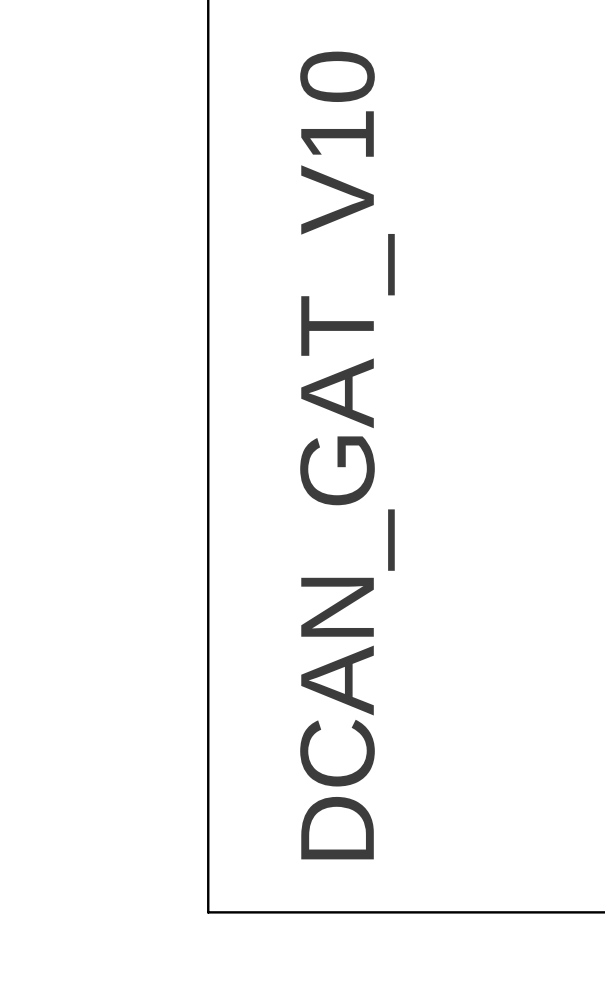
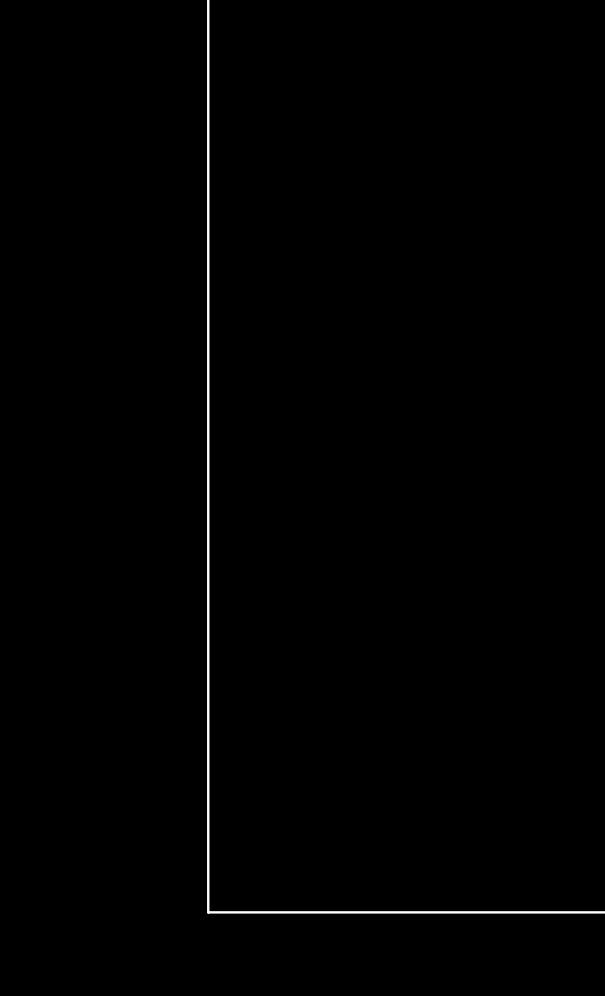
text: DCAN_GAT_V10 (347, 455) -> none

